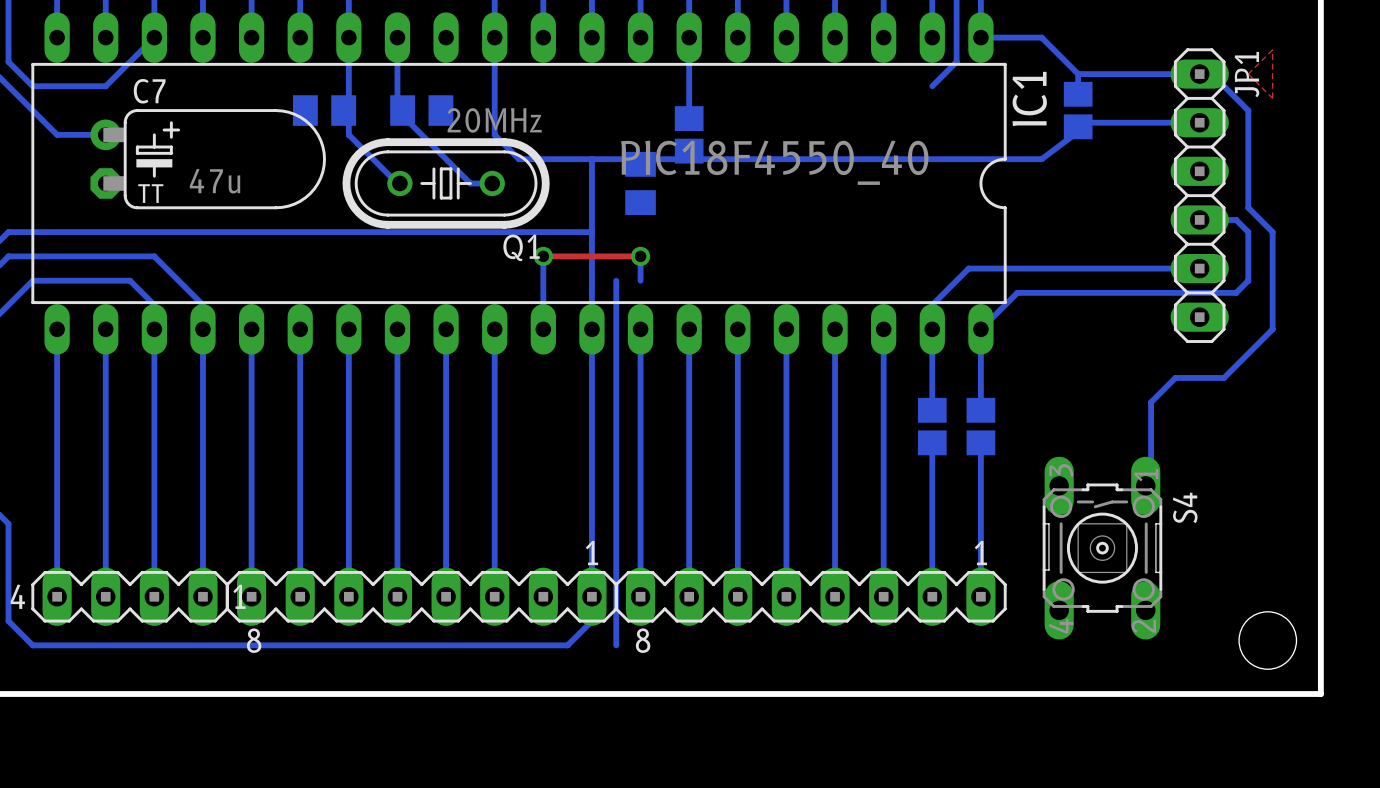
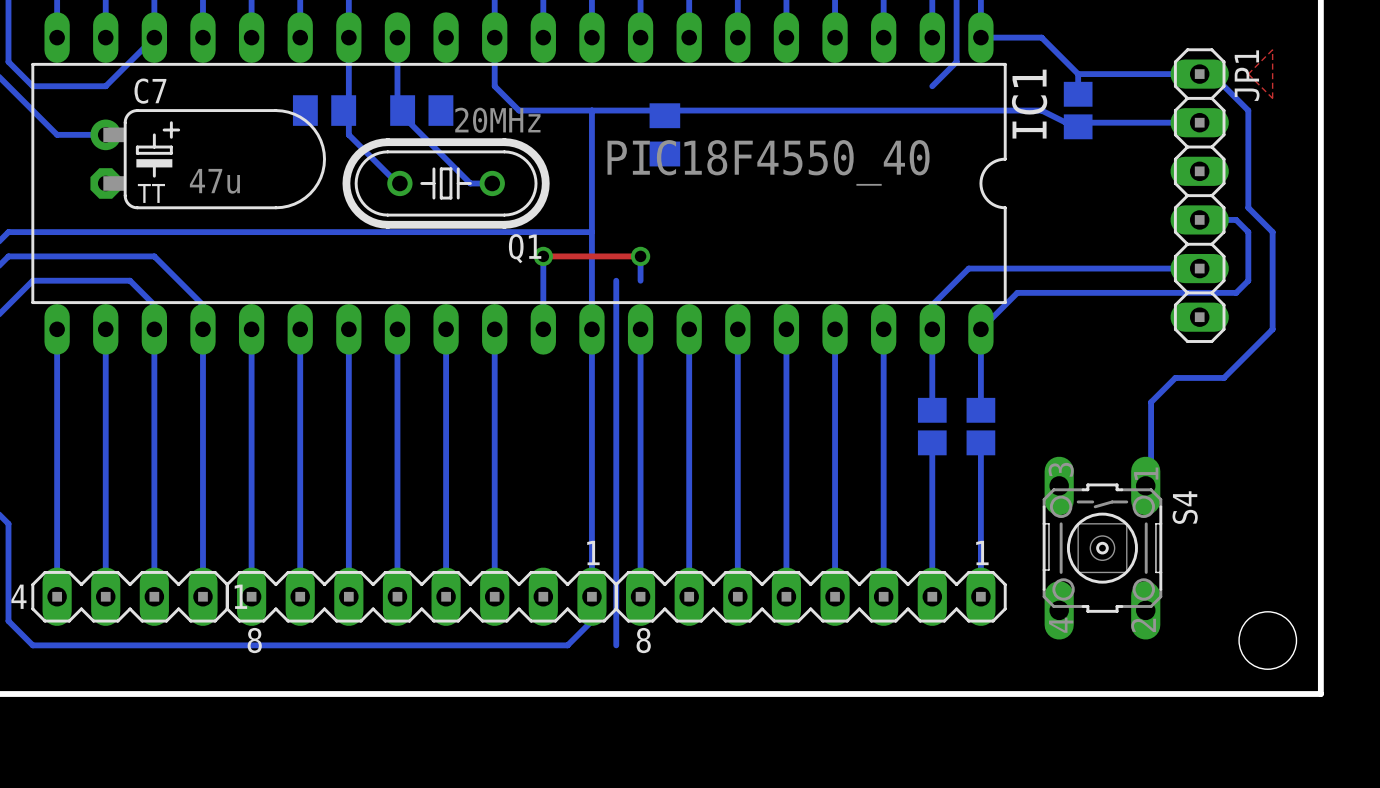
bottom track: (689, 37) (689, 118) -> none
bottom track: (494, 86) (494, 134) (519, 159) (1041, 159) (1090, 122) (1078, 126) -> (494, 86) (519, 110) (1041, 110) (1066, 122)
bottom track: none -> (591, 110) (591, 159)
part: (689, 134) -> none
part position: (640, 183) -> (664, 134)

